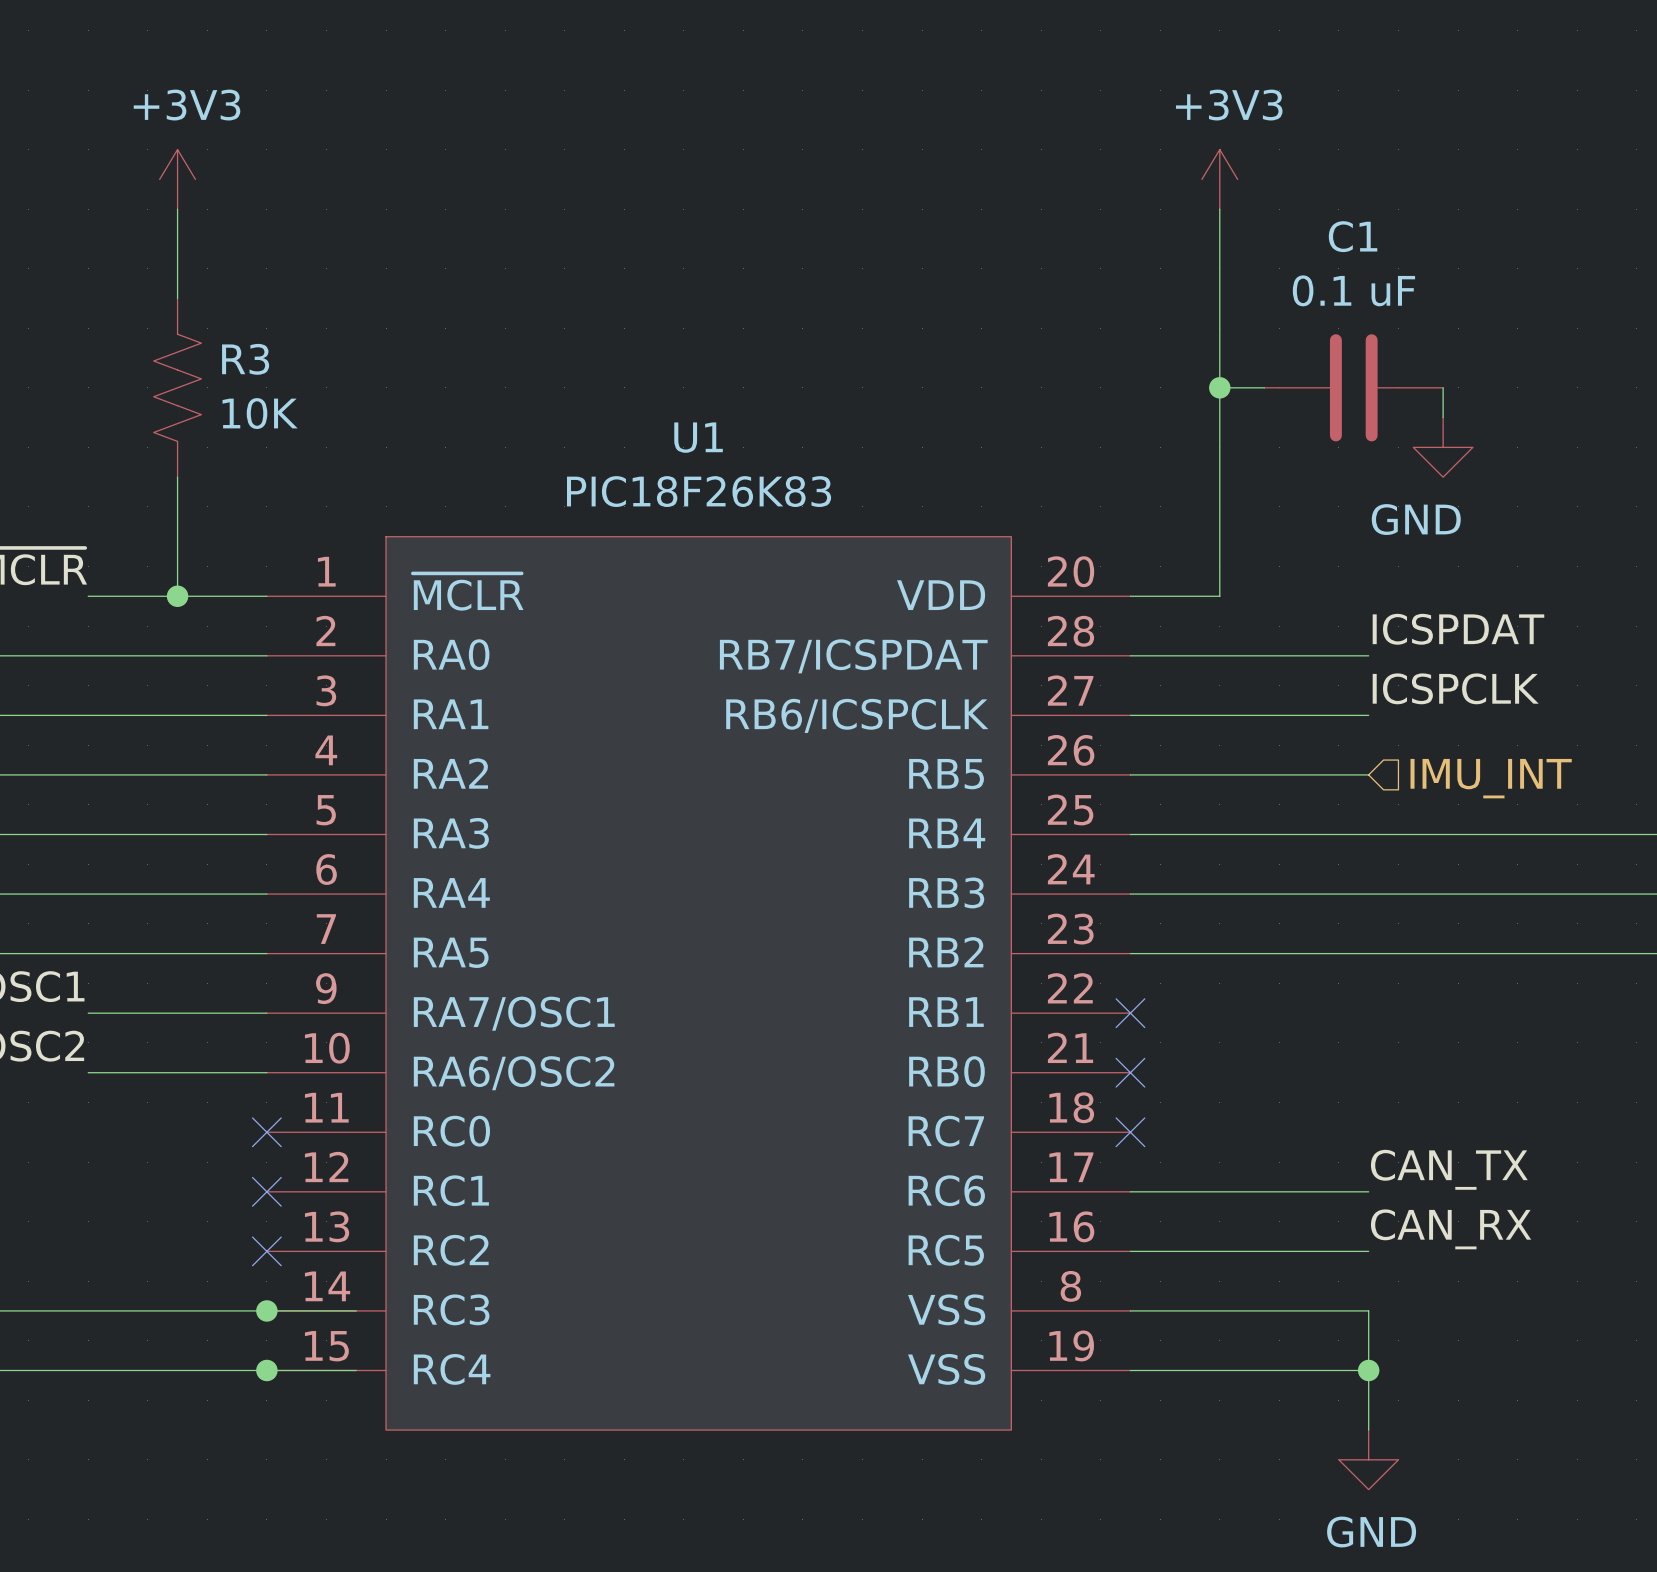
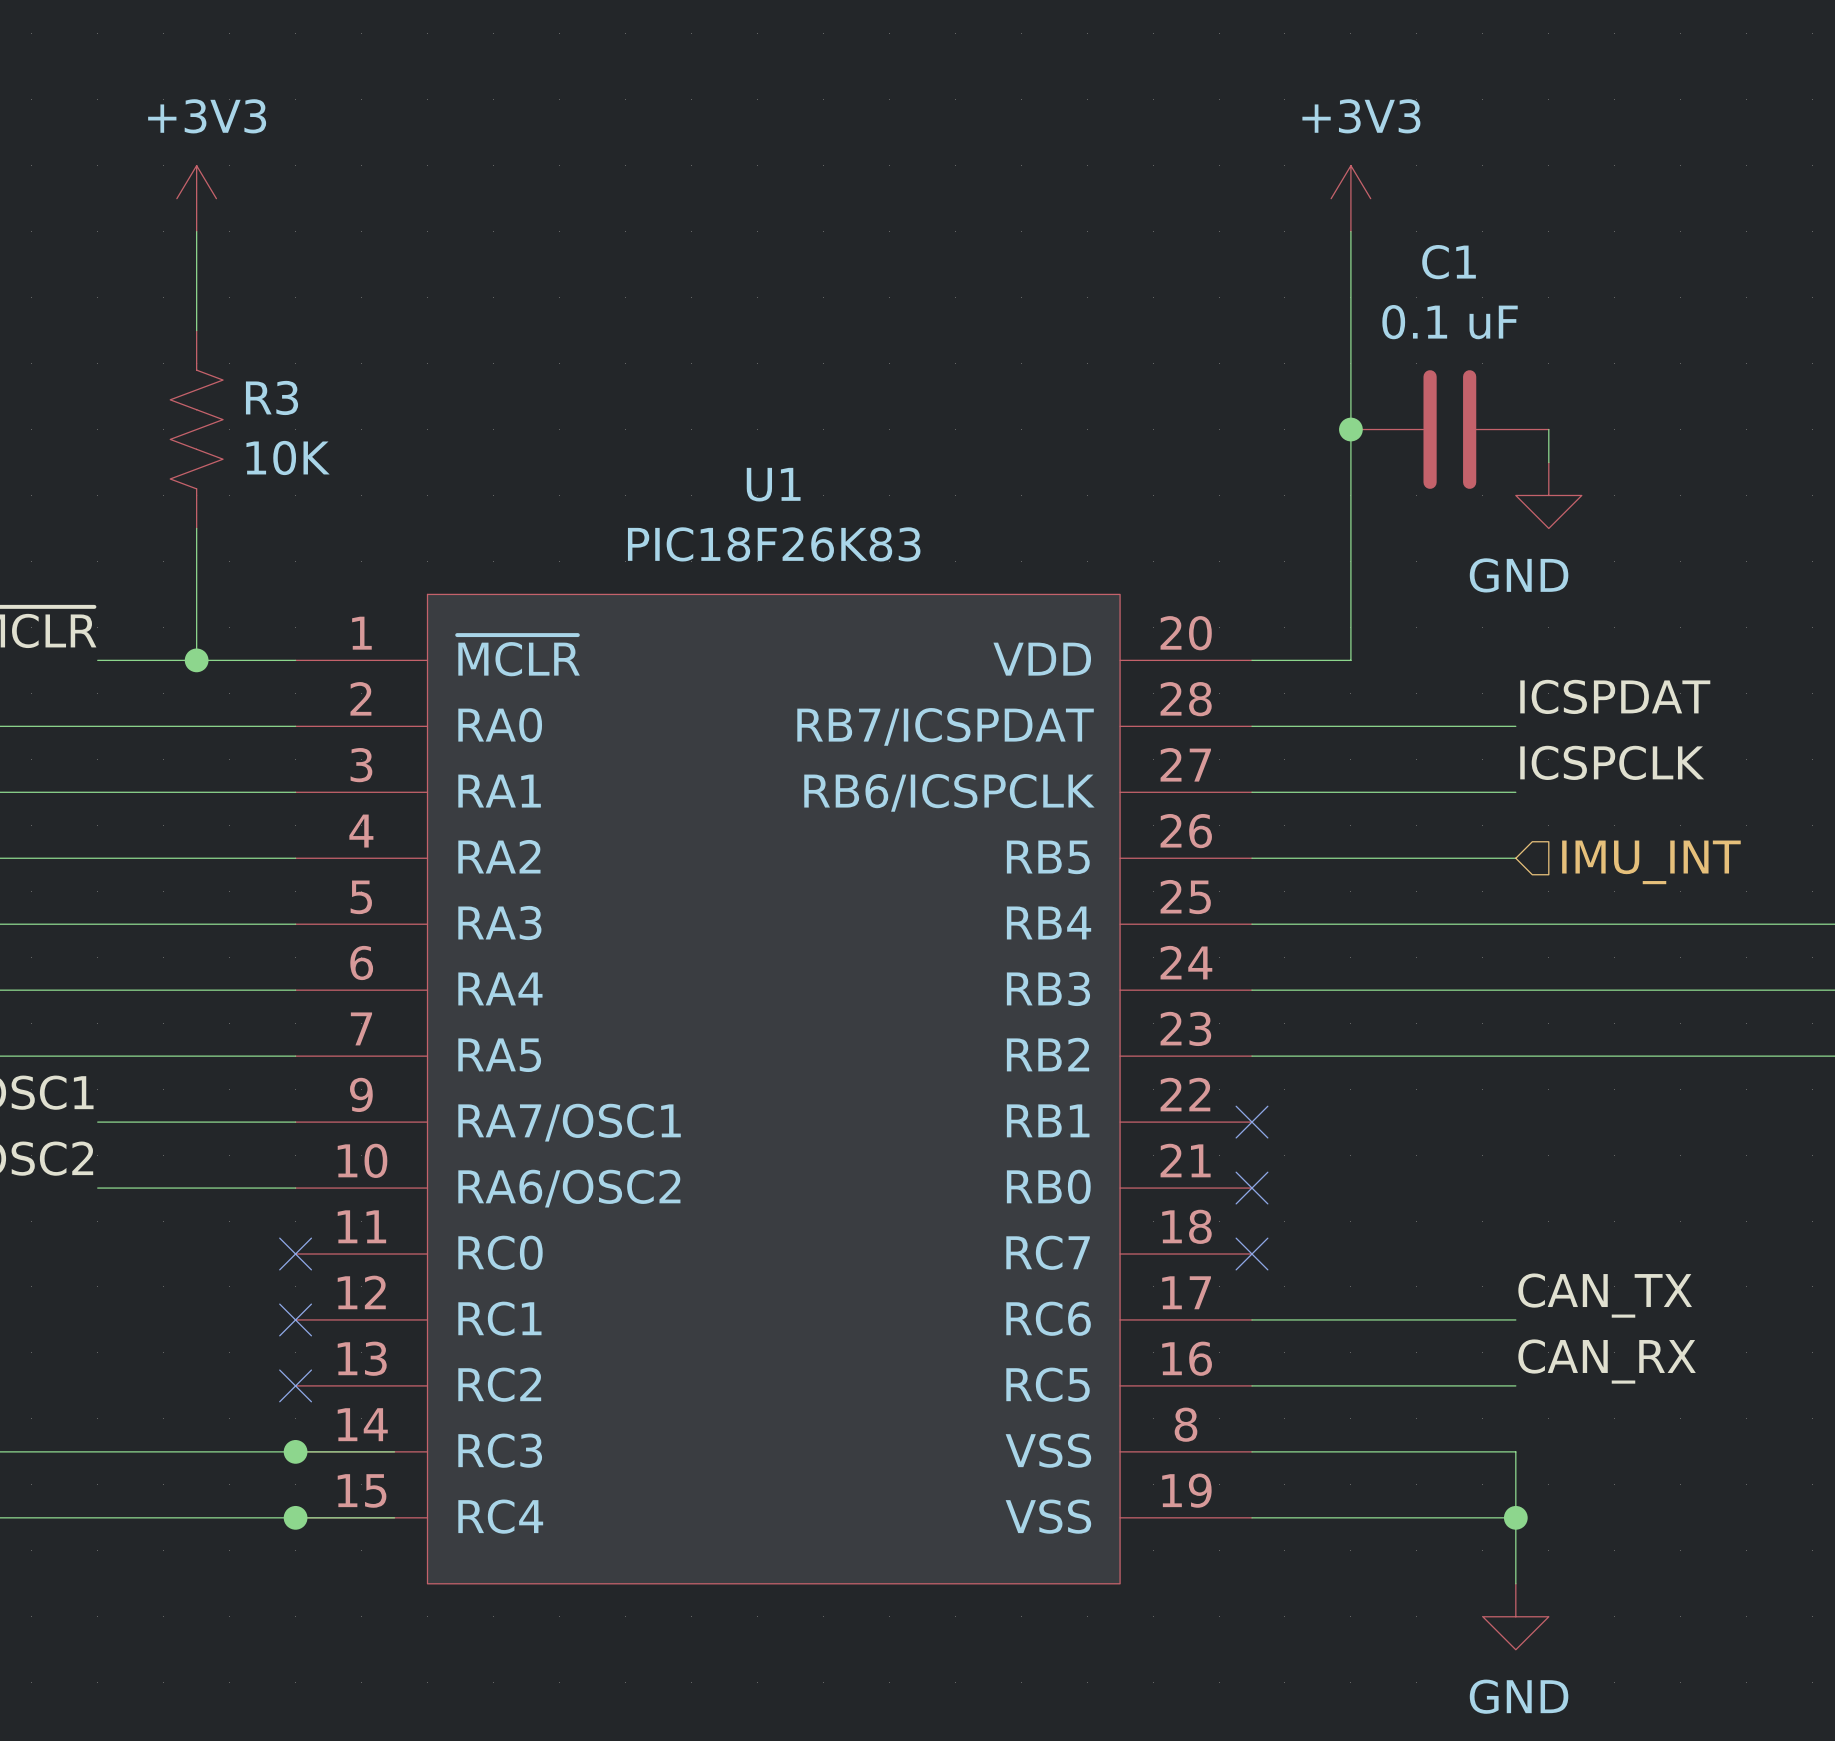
C1 position: (1353, 387) -> (1449, 429)
wire: (1443, 387) (1443, 417) -> (1548, 429) (1548, 462)
power symbol position: GND (1443, 447) -> GND (1548, 495)

